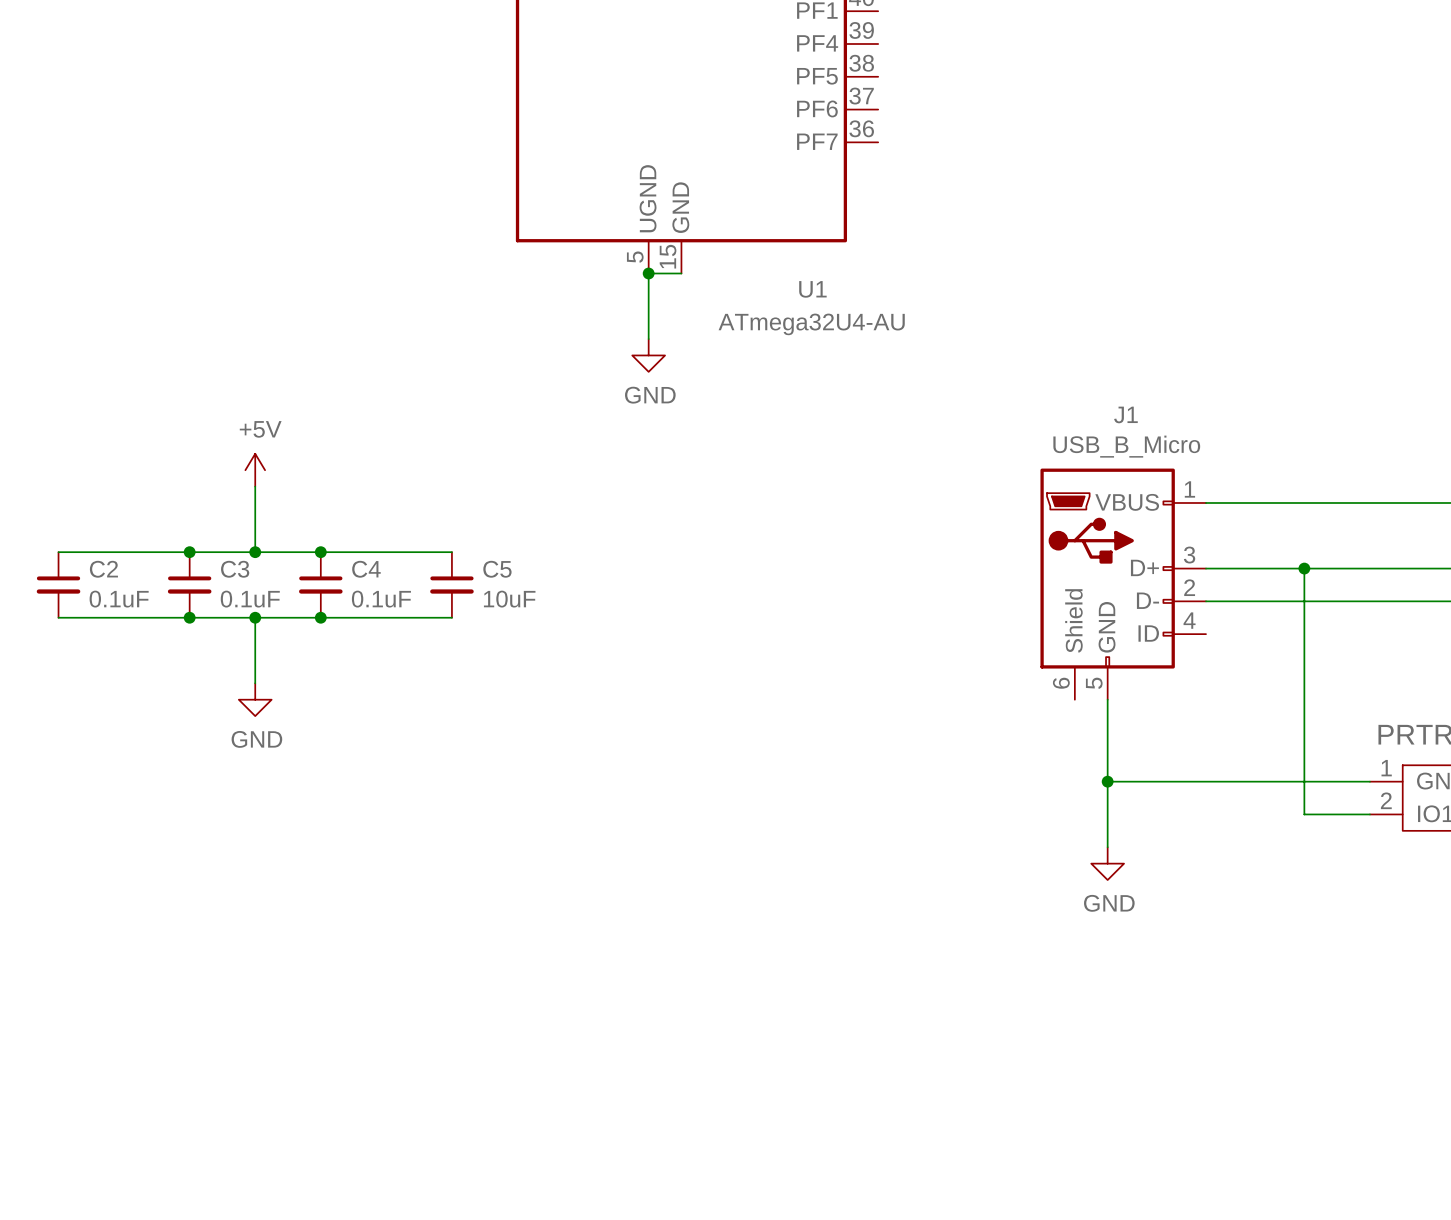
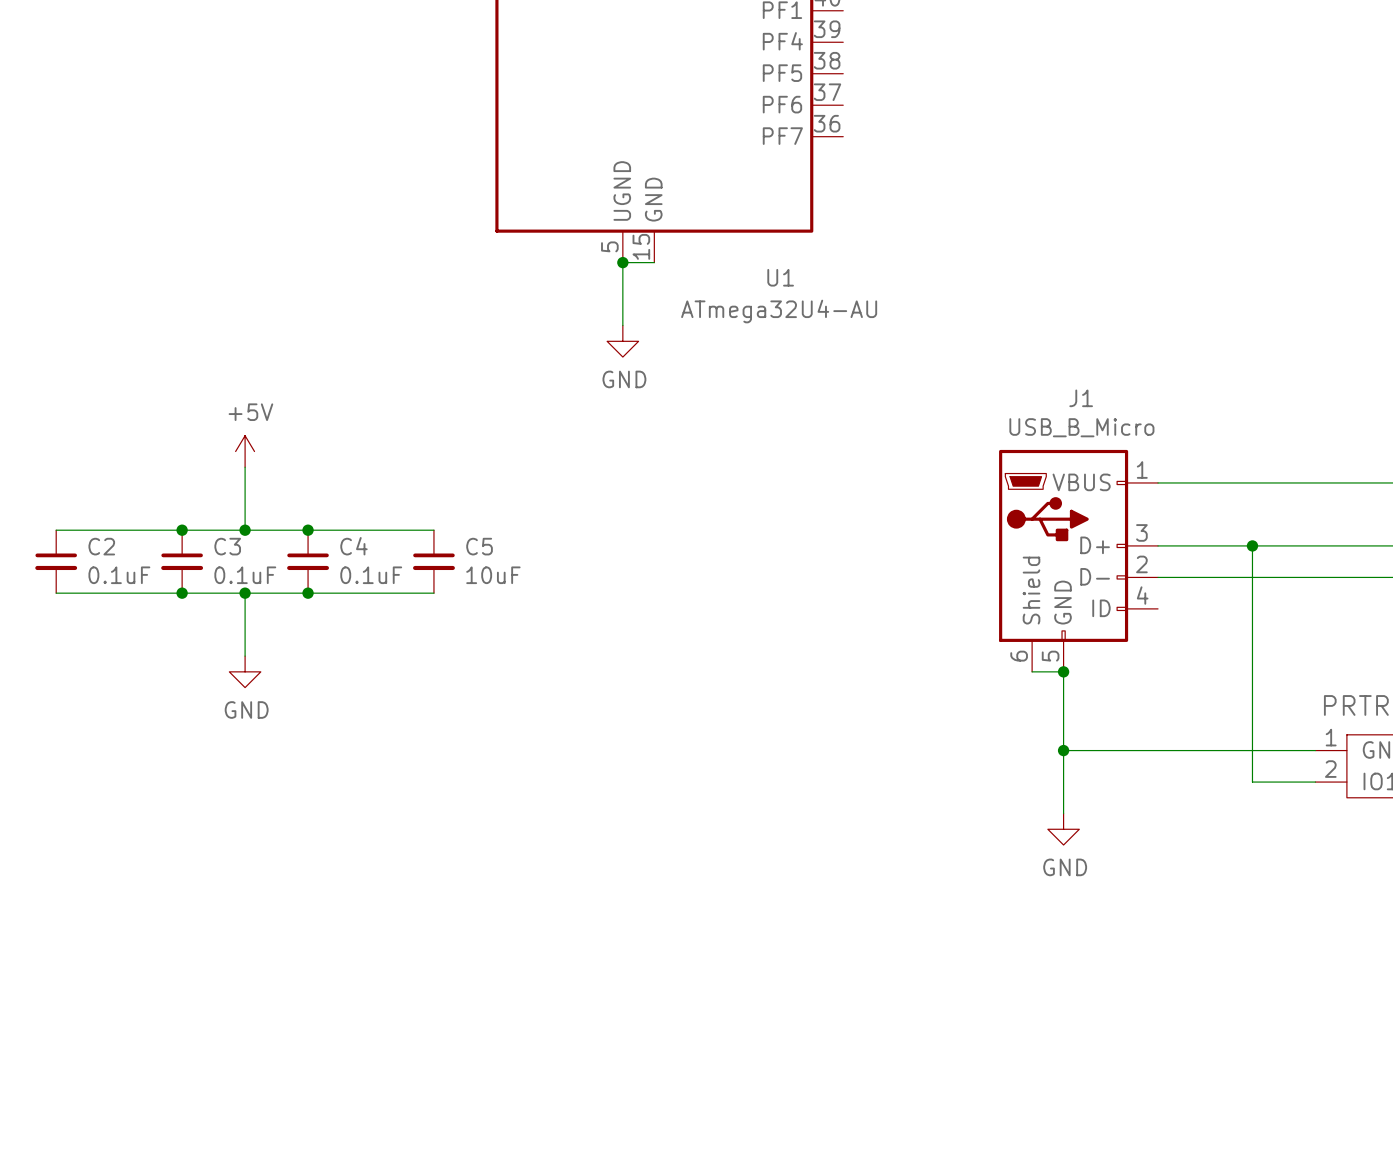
wire: none -> (1032, 671) (1063, 671)
junction: none -> (1063, 671)

